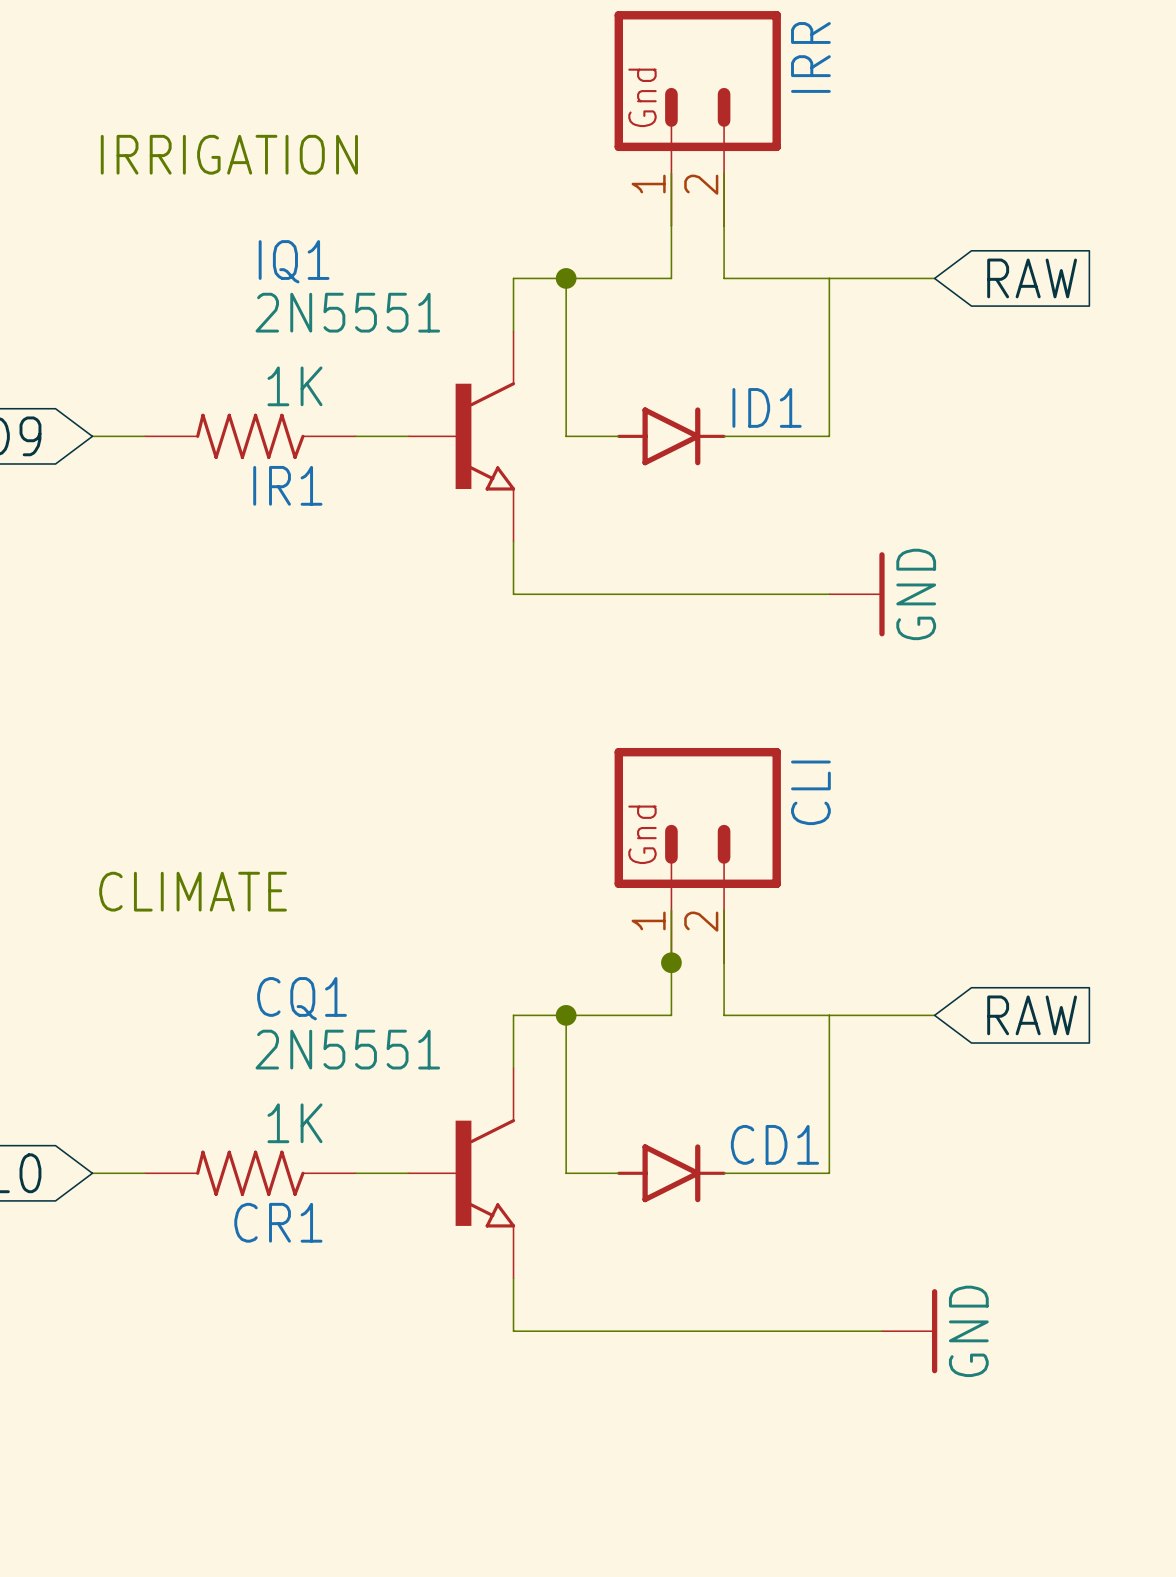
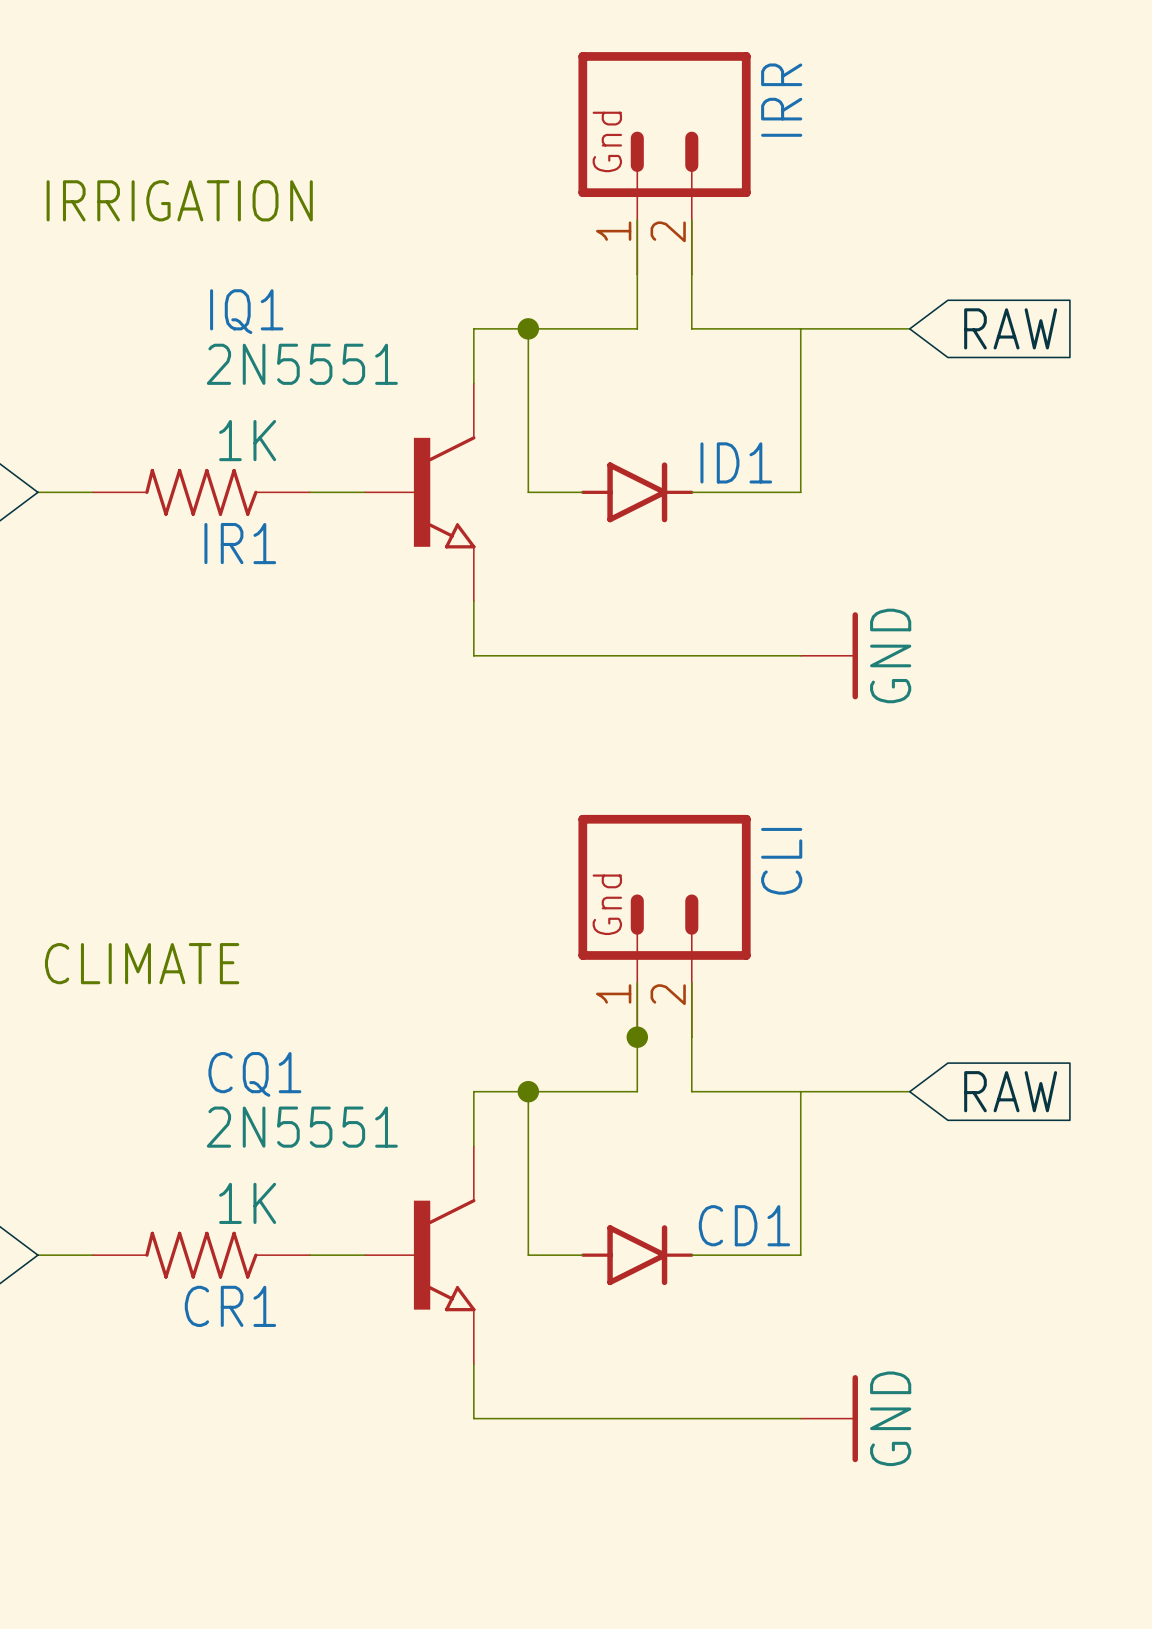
power symbol position: GND (909, 1331) -> GND (829, 1418)

